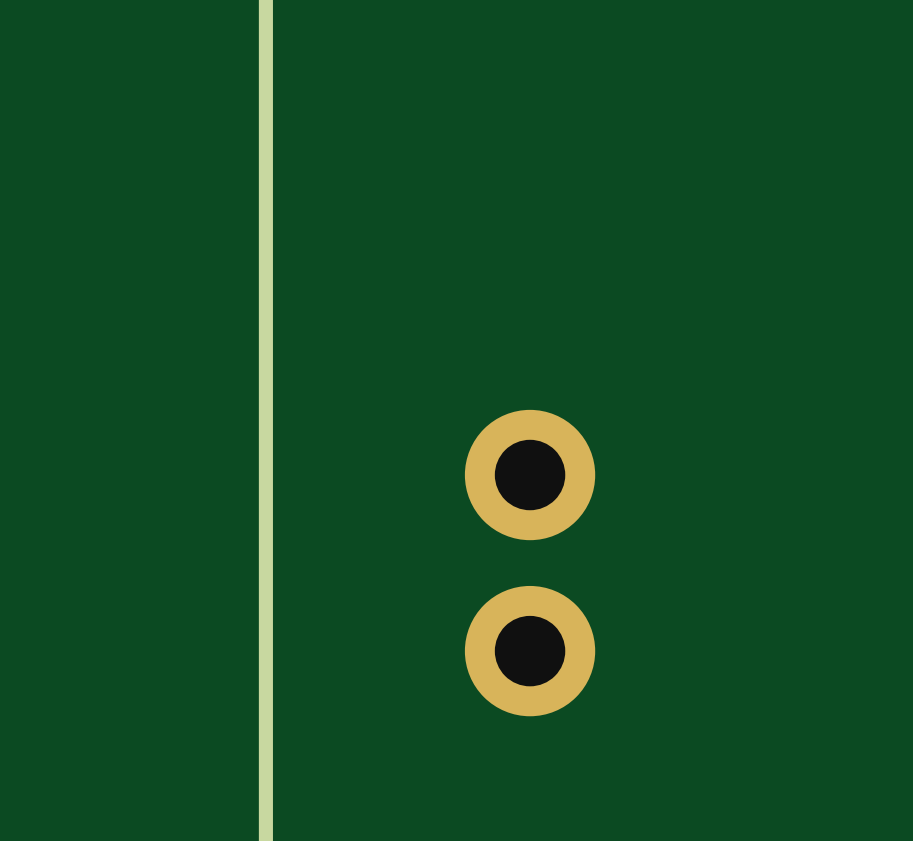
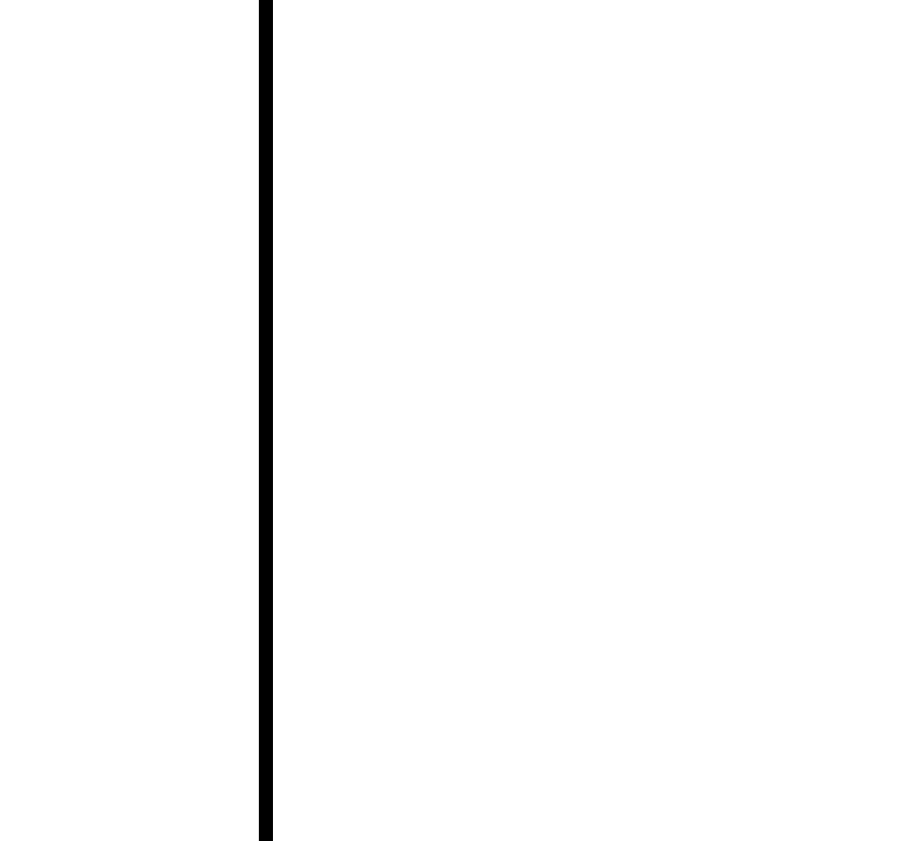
part: (530, 563) -> none

